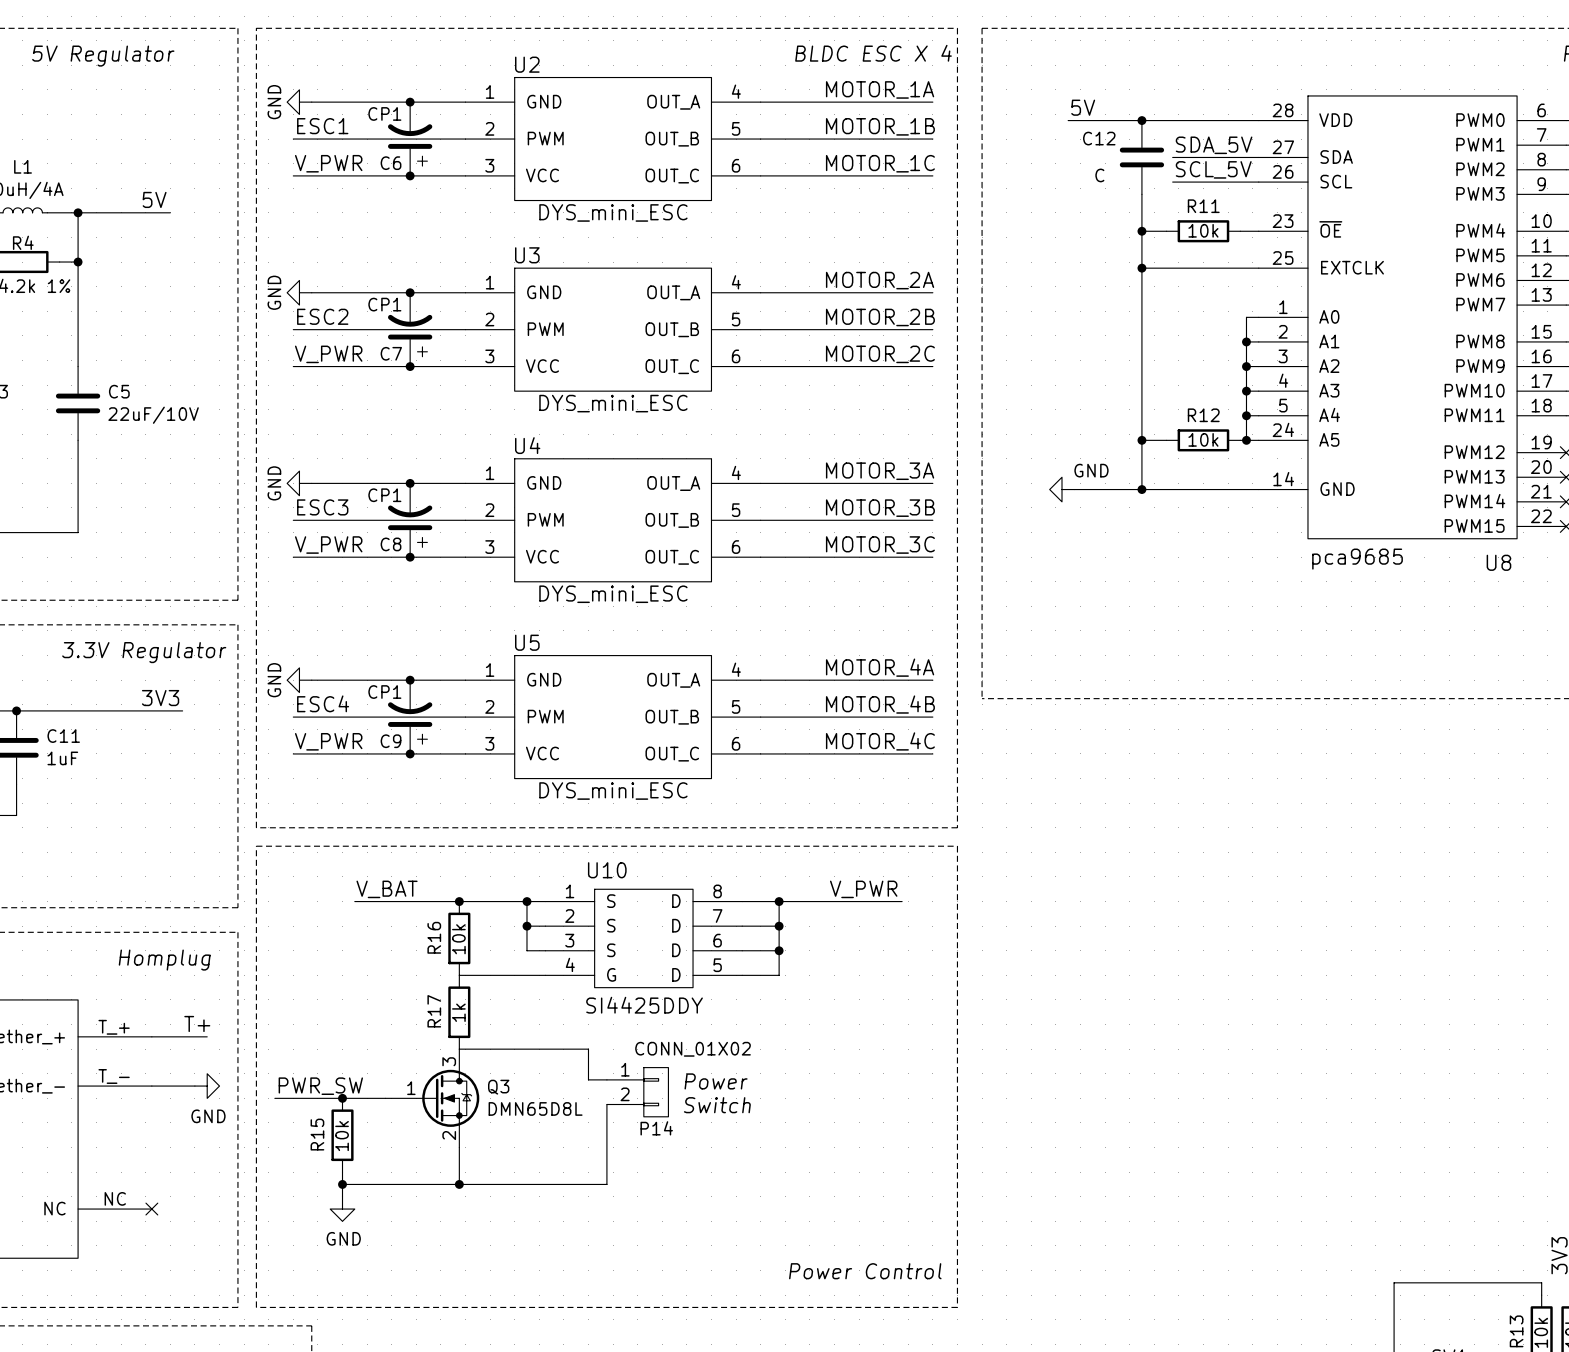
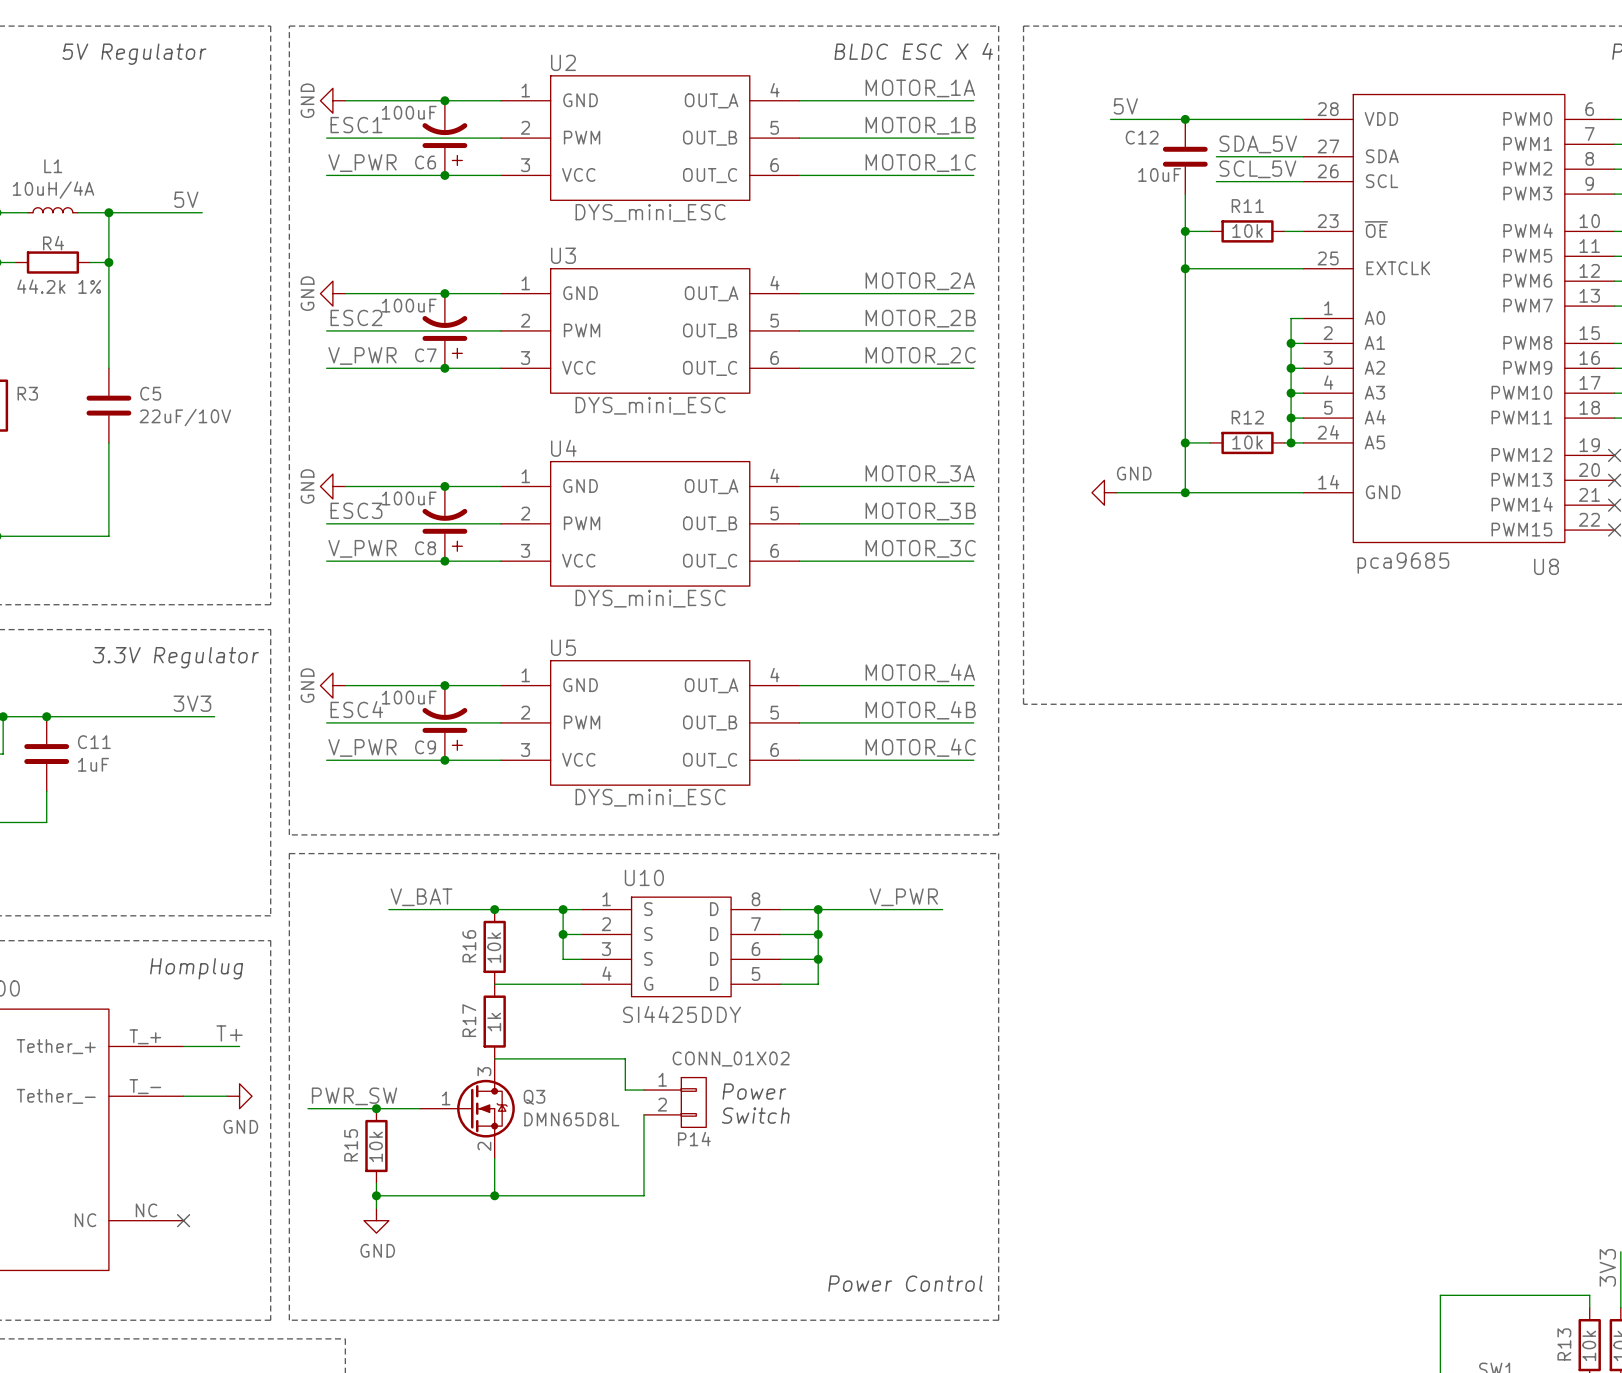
C6 value: CP1 (384, 113) -> 100uF (409, 112)
C12 value: C (1099, 175) -> 10uF (1159, 174)
C7 value: CP1 (384, 304) -> 100uF (409, 305)
C8 value: CP1 (384, 495) -> 100uF (409, 498)
C9 value: CP1 (384, 692) -> 100uF (409, 697)

